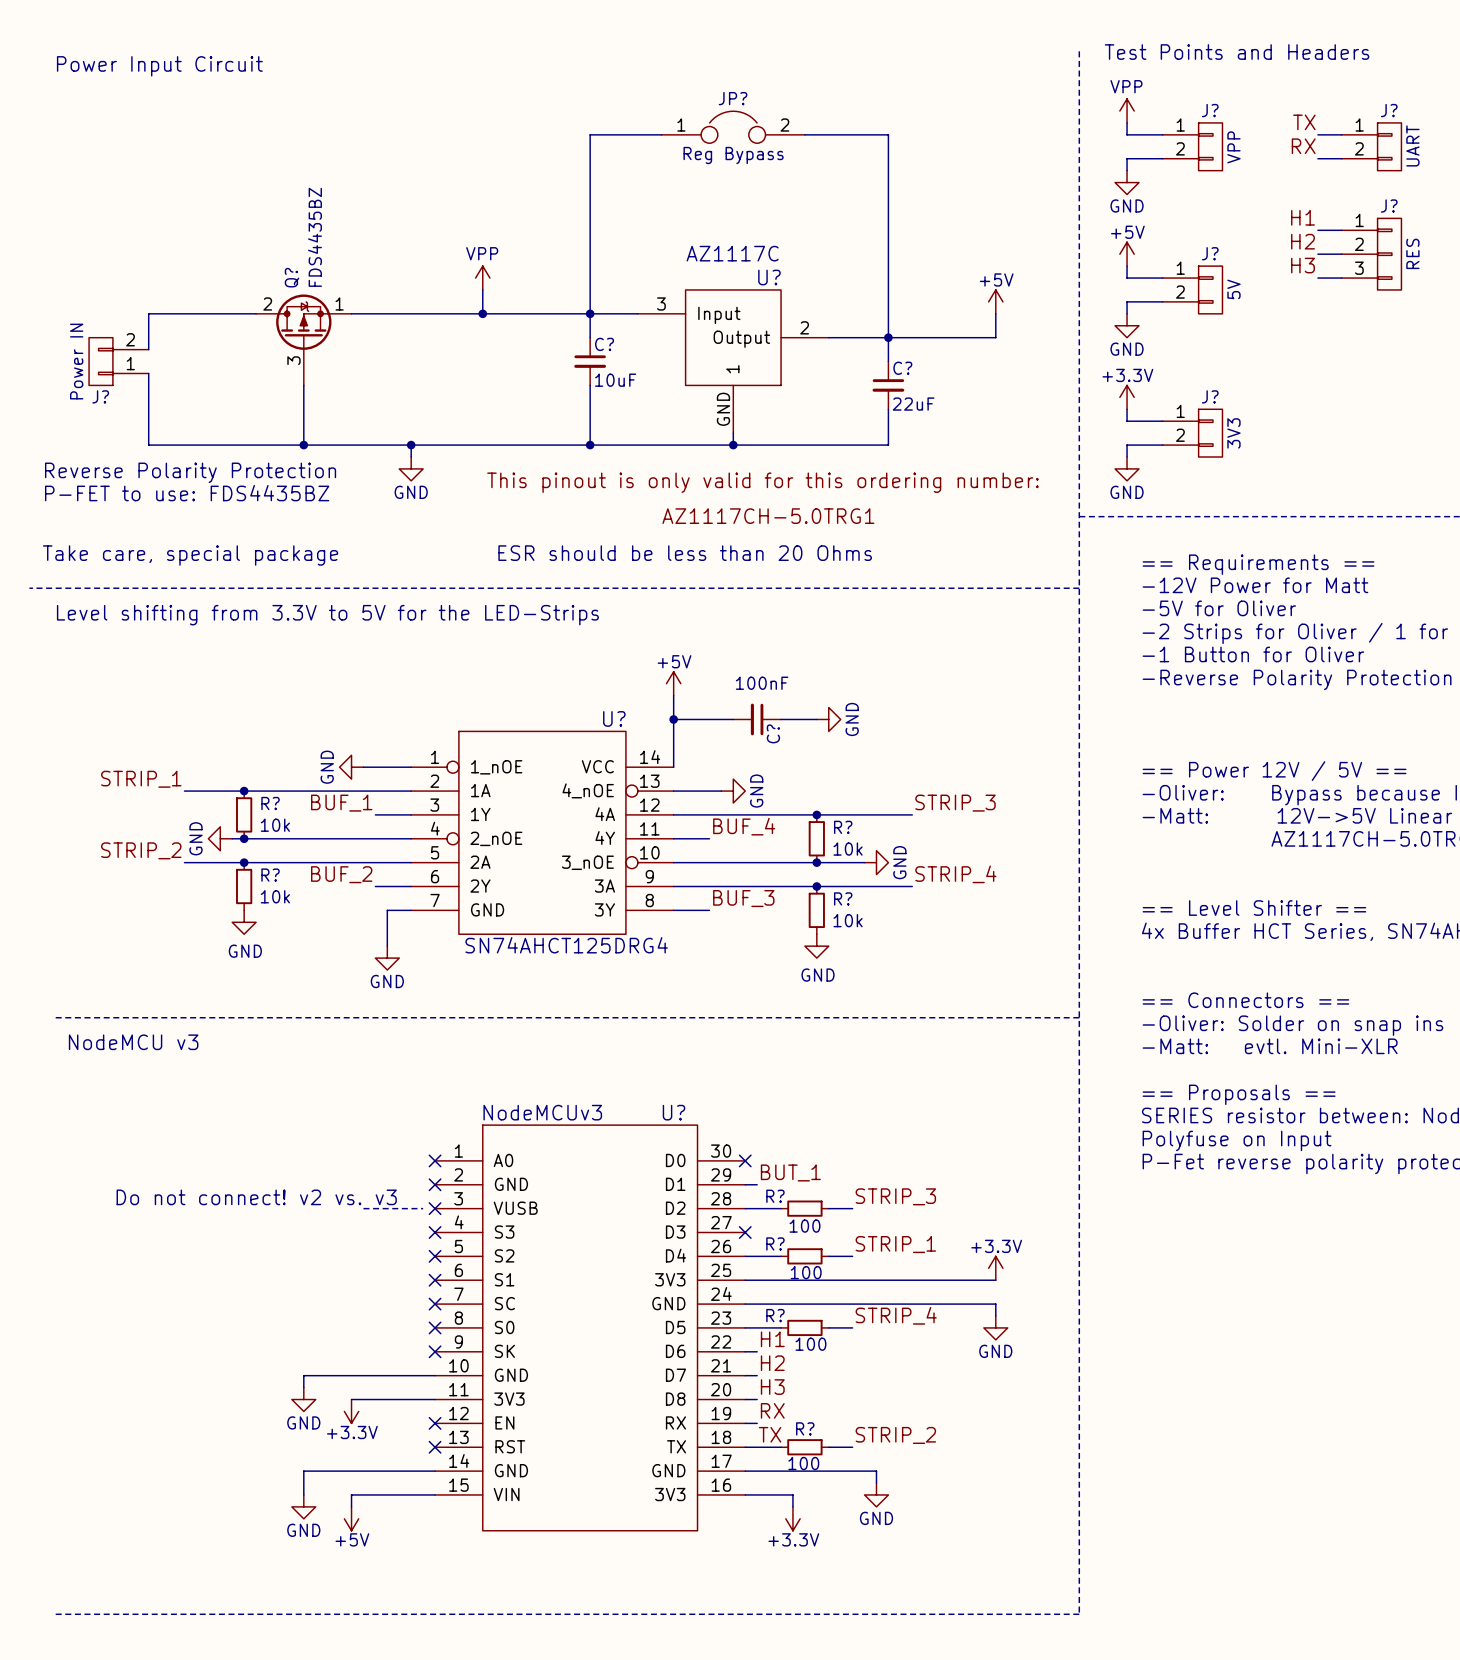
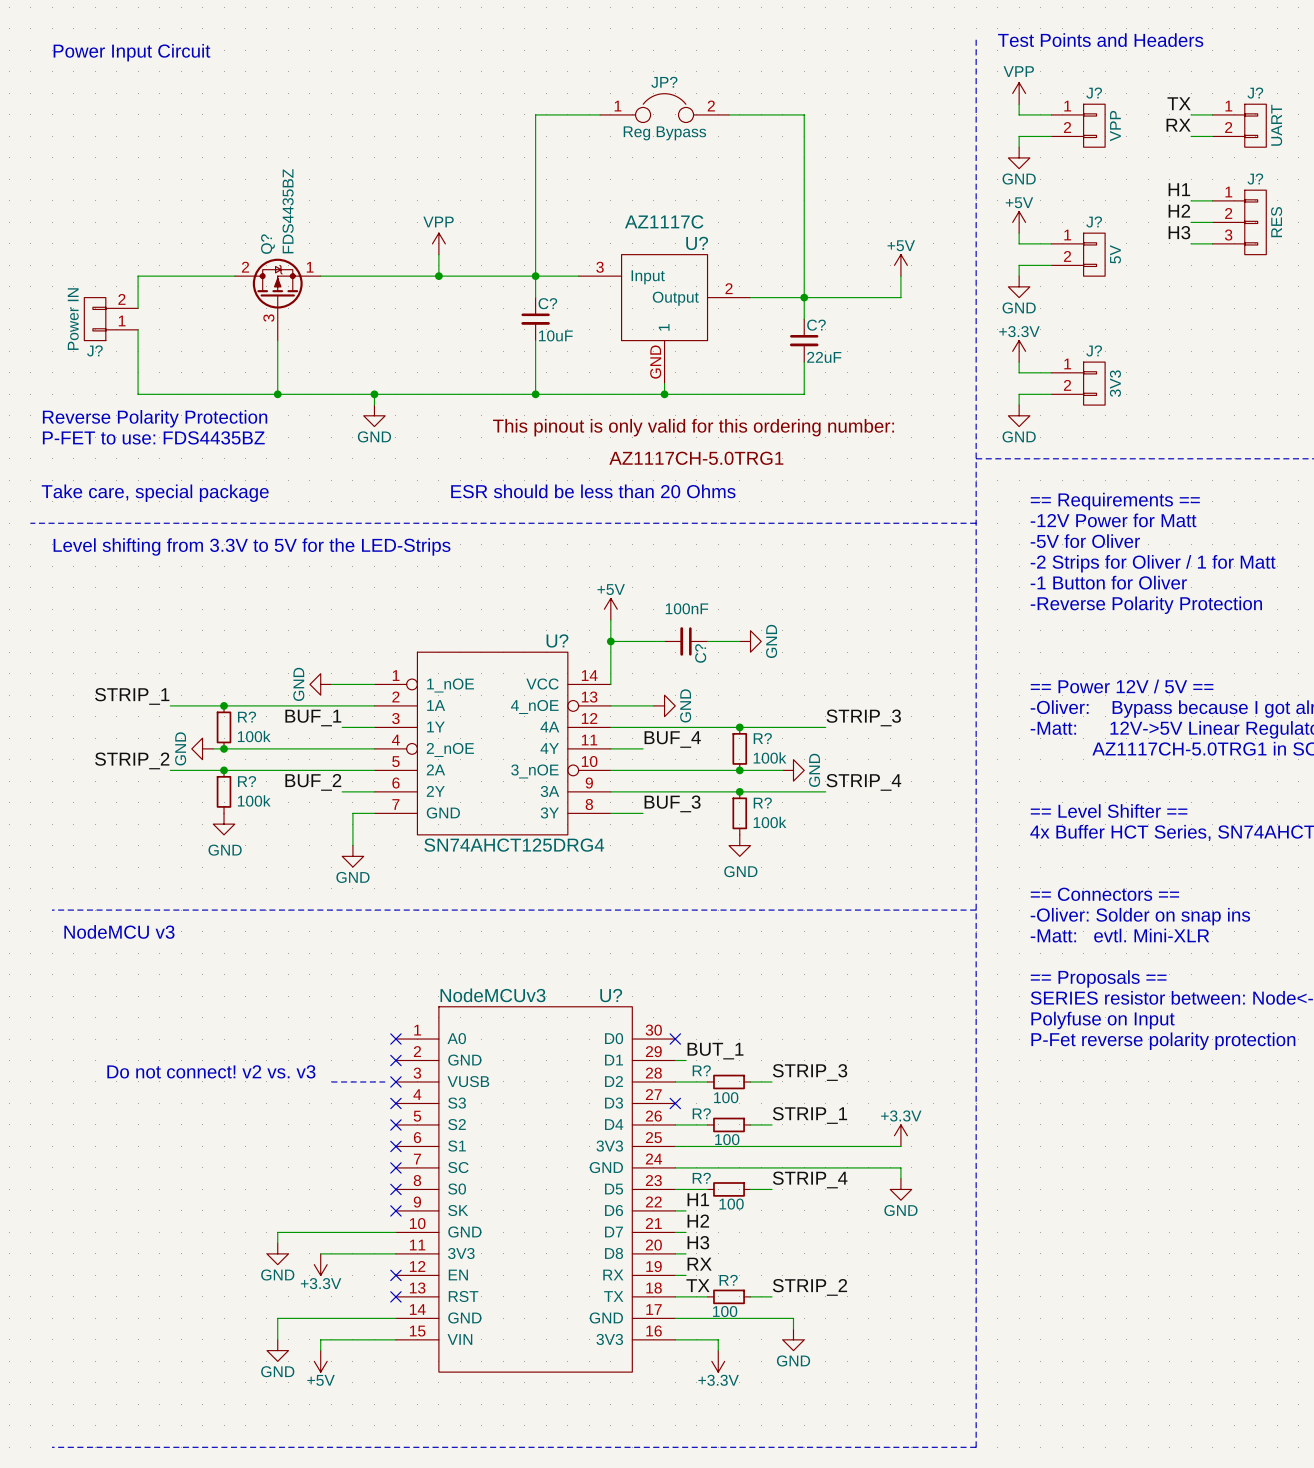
R? value: 10k (275, 825) -> 100k (254, 736)
R? value: 10k (848, 849) -> 100k (769, 757)
R? value: 10k (275, 896) -> 100k (254, 800)
R? value: 10k (848, 920) -> 100k (769, 822)

